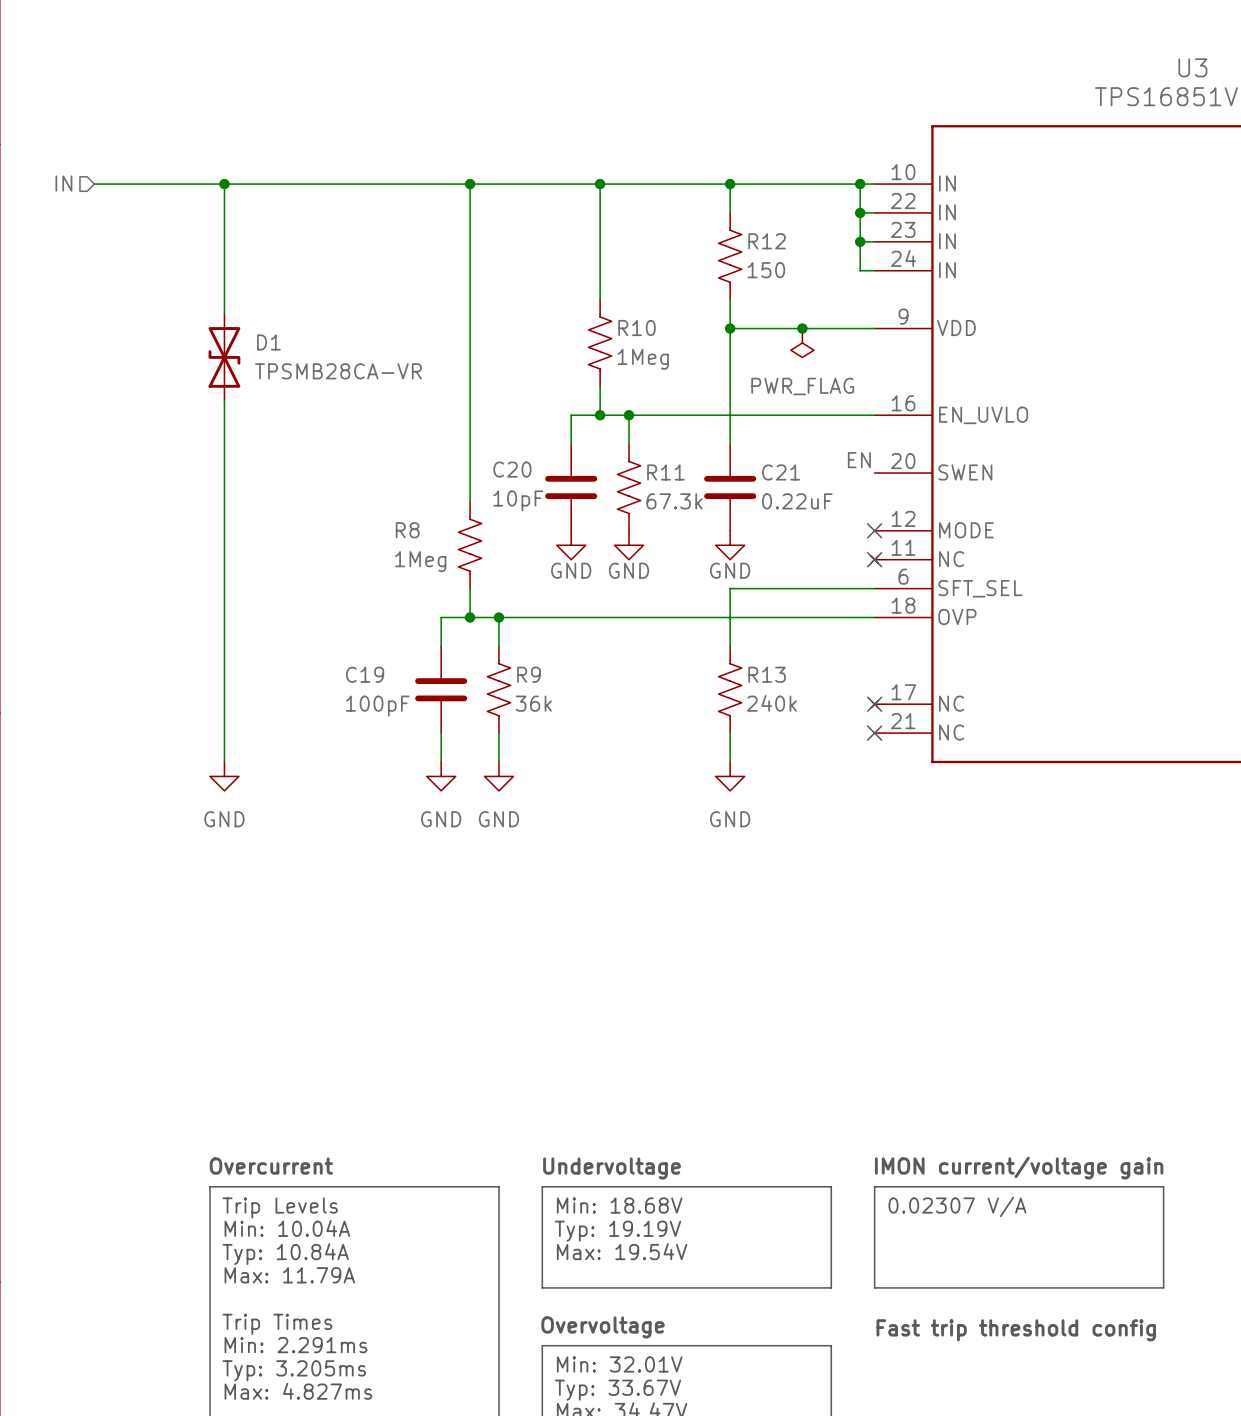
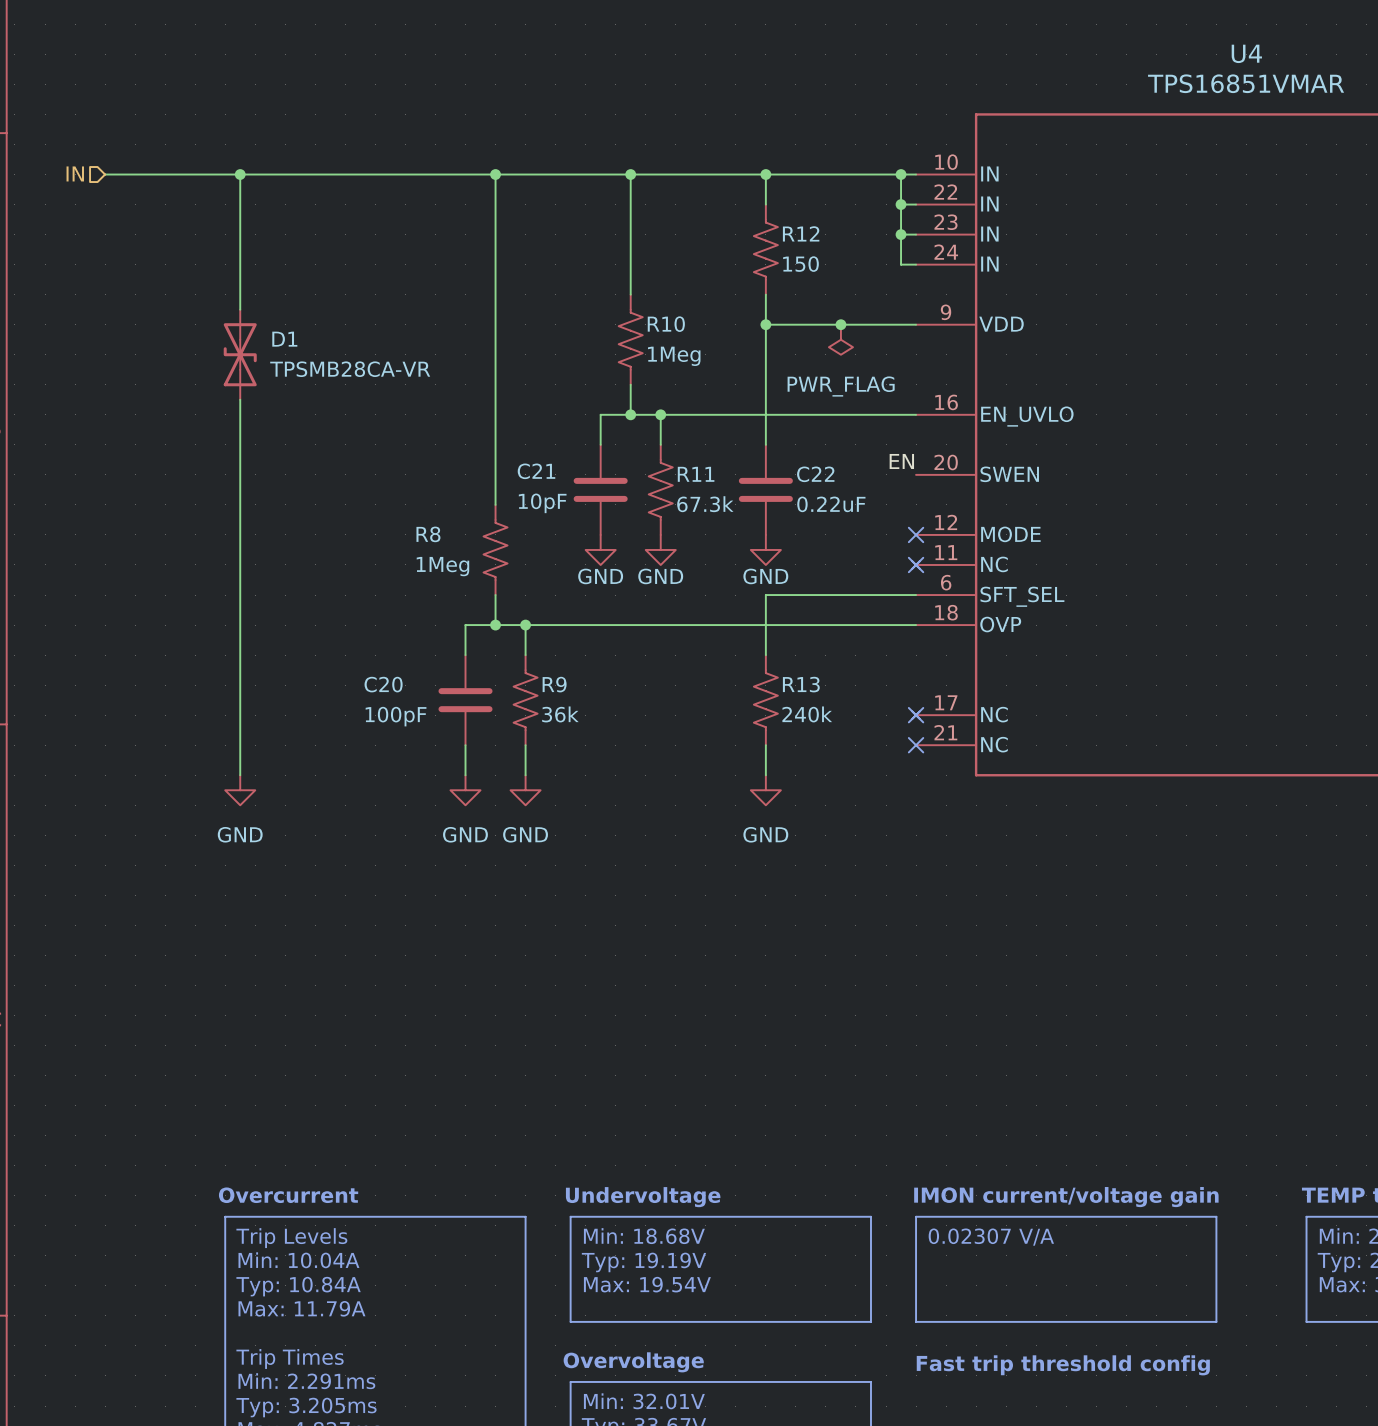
U3 name: U3 (1192, 67) -> U4 (1246, 53)
C20 name: C20 (512, 469) -> C21 (536, 471)
C21 name: C21 (781, 472) -> C22 (815, 474)
C19 name: C19 (365, 674) -> C20 (383, 684)

